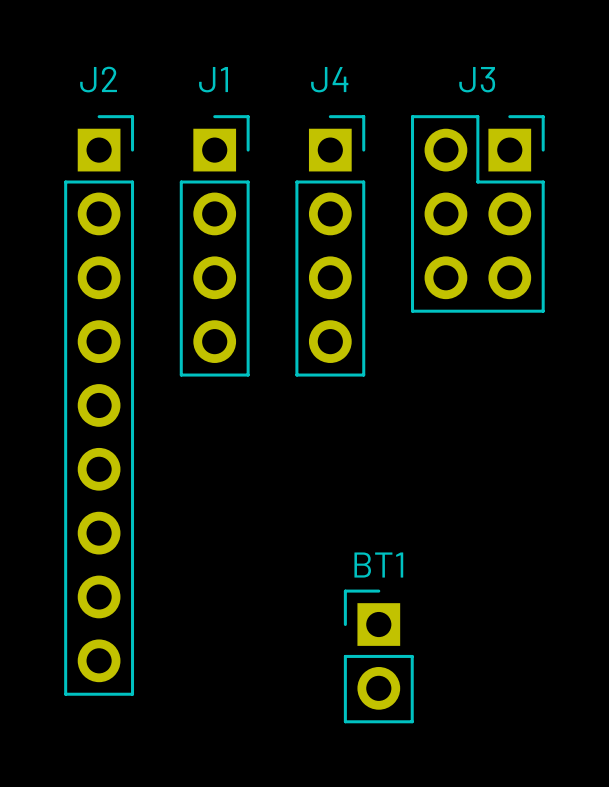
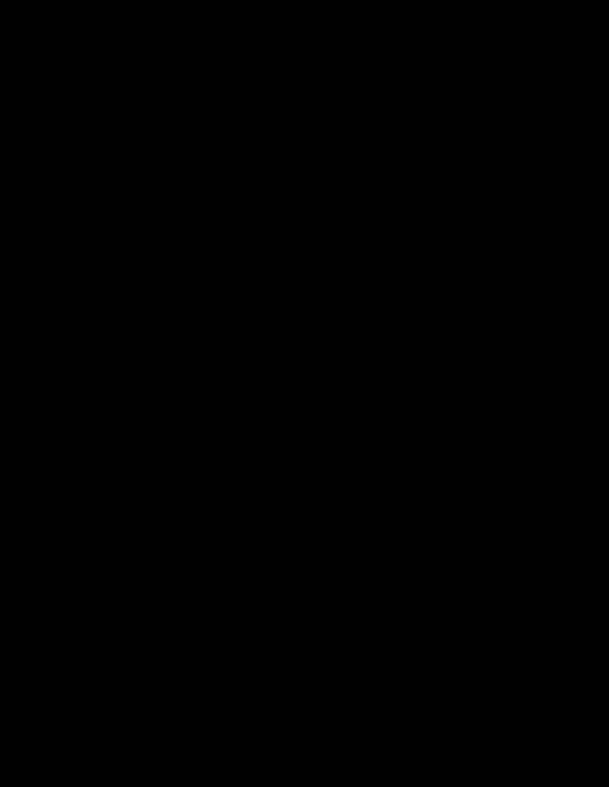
J3: (477, 213) -> none
J1: (214, 245) -> none
J4: (330, 245) -> none
J2: (99, 405) -> none
BT1: (378, 656) -> none

